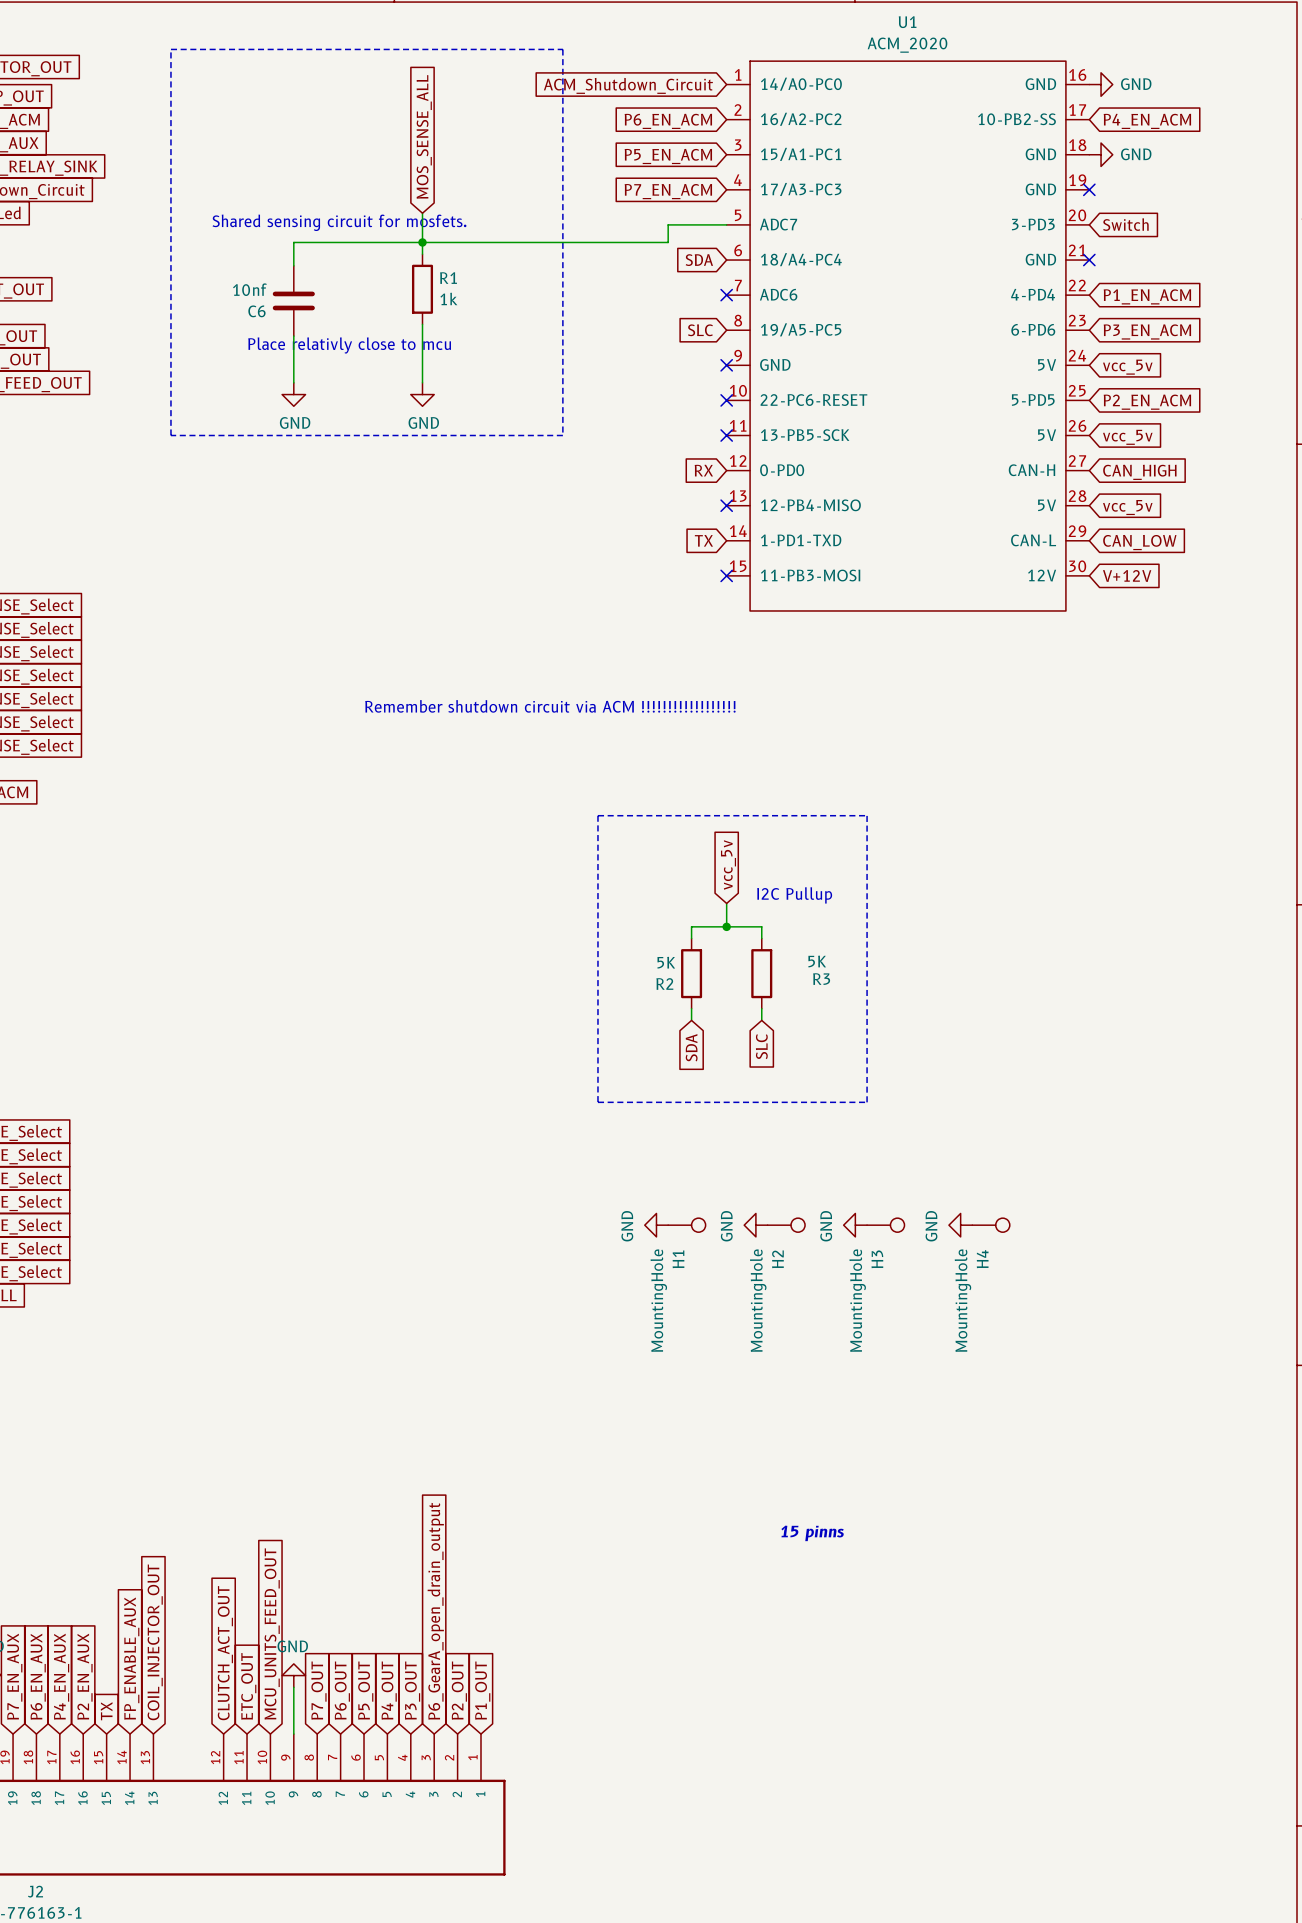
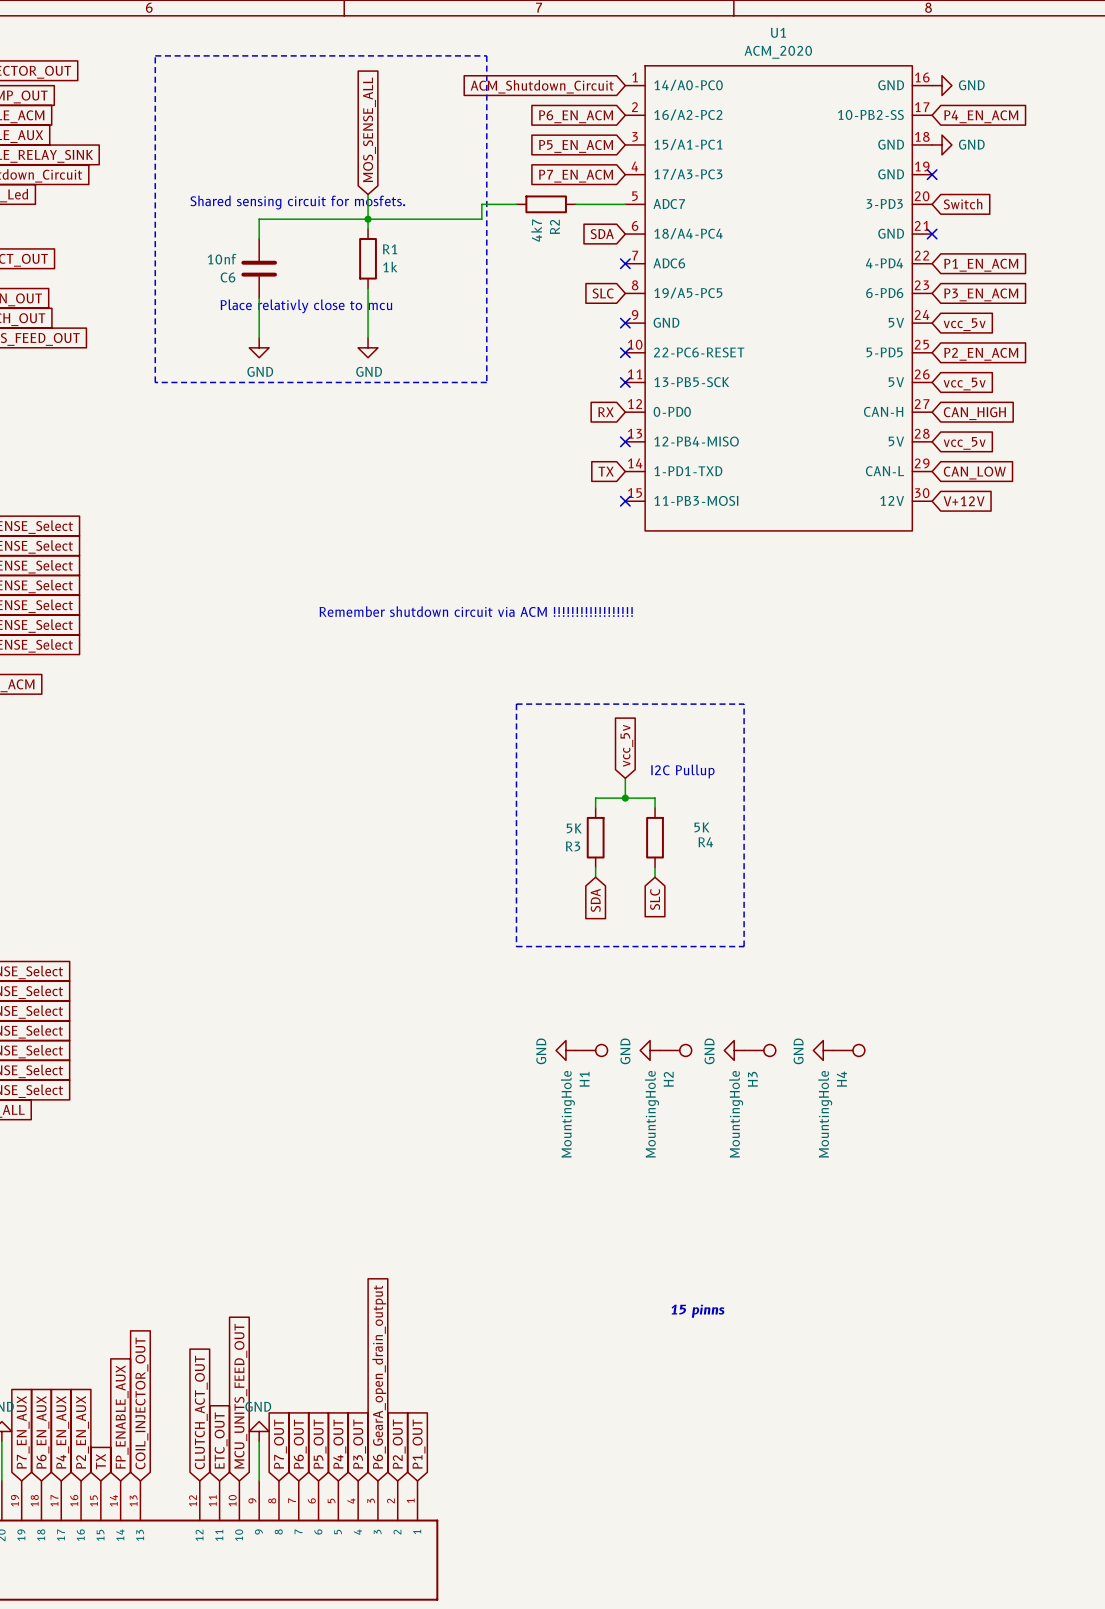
R2: none -> 4k7 (546, 204)
wire: (668, 224) (668, 242) (557, 242) -> (516, 204) (481, 204) (481, 219)
R3 name: R3 (821, 979) -> R4 (705, 842)
R2 name: R2 (664, 983) -> R3 (573, 846)

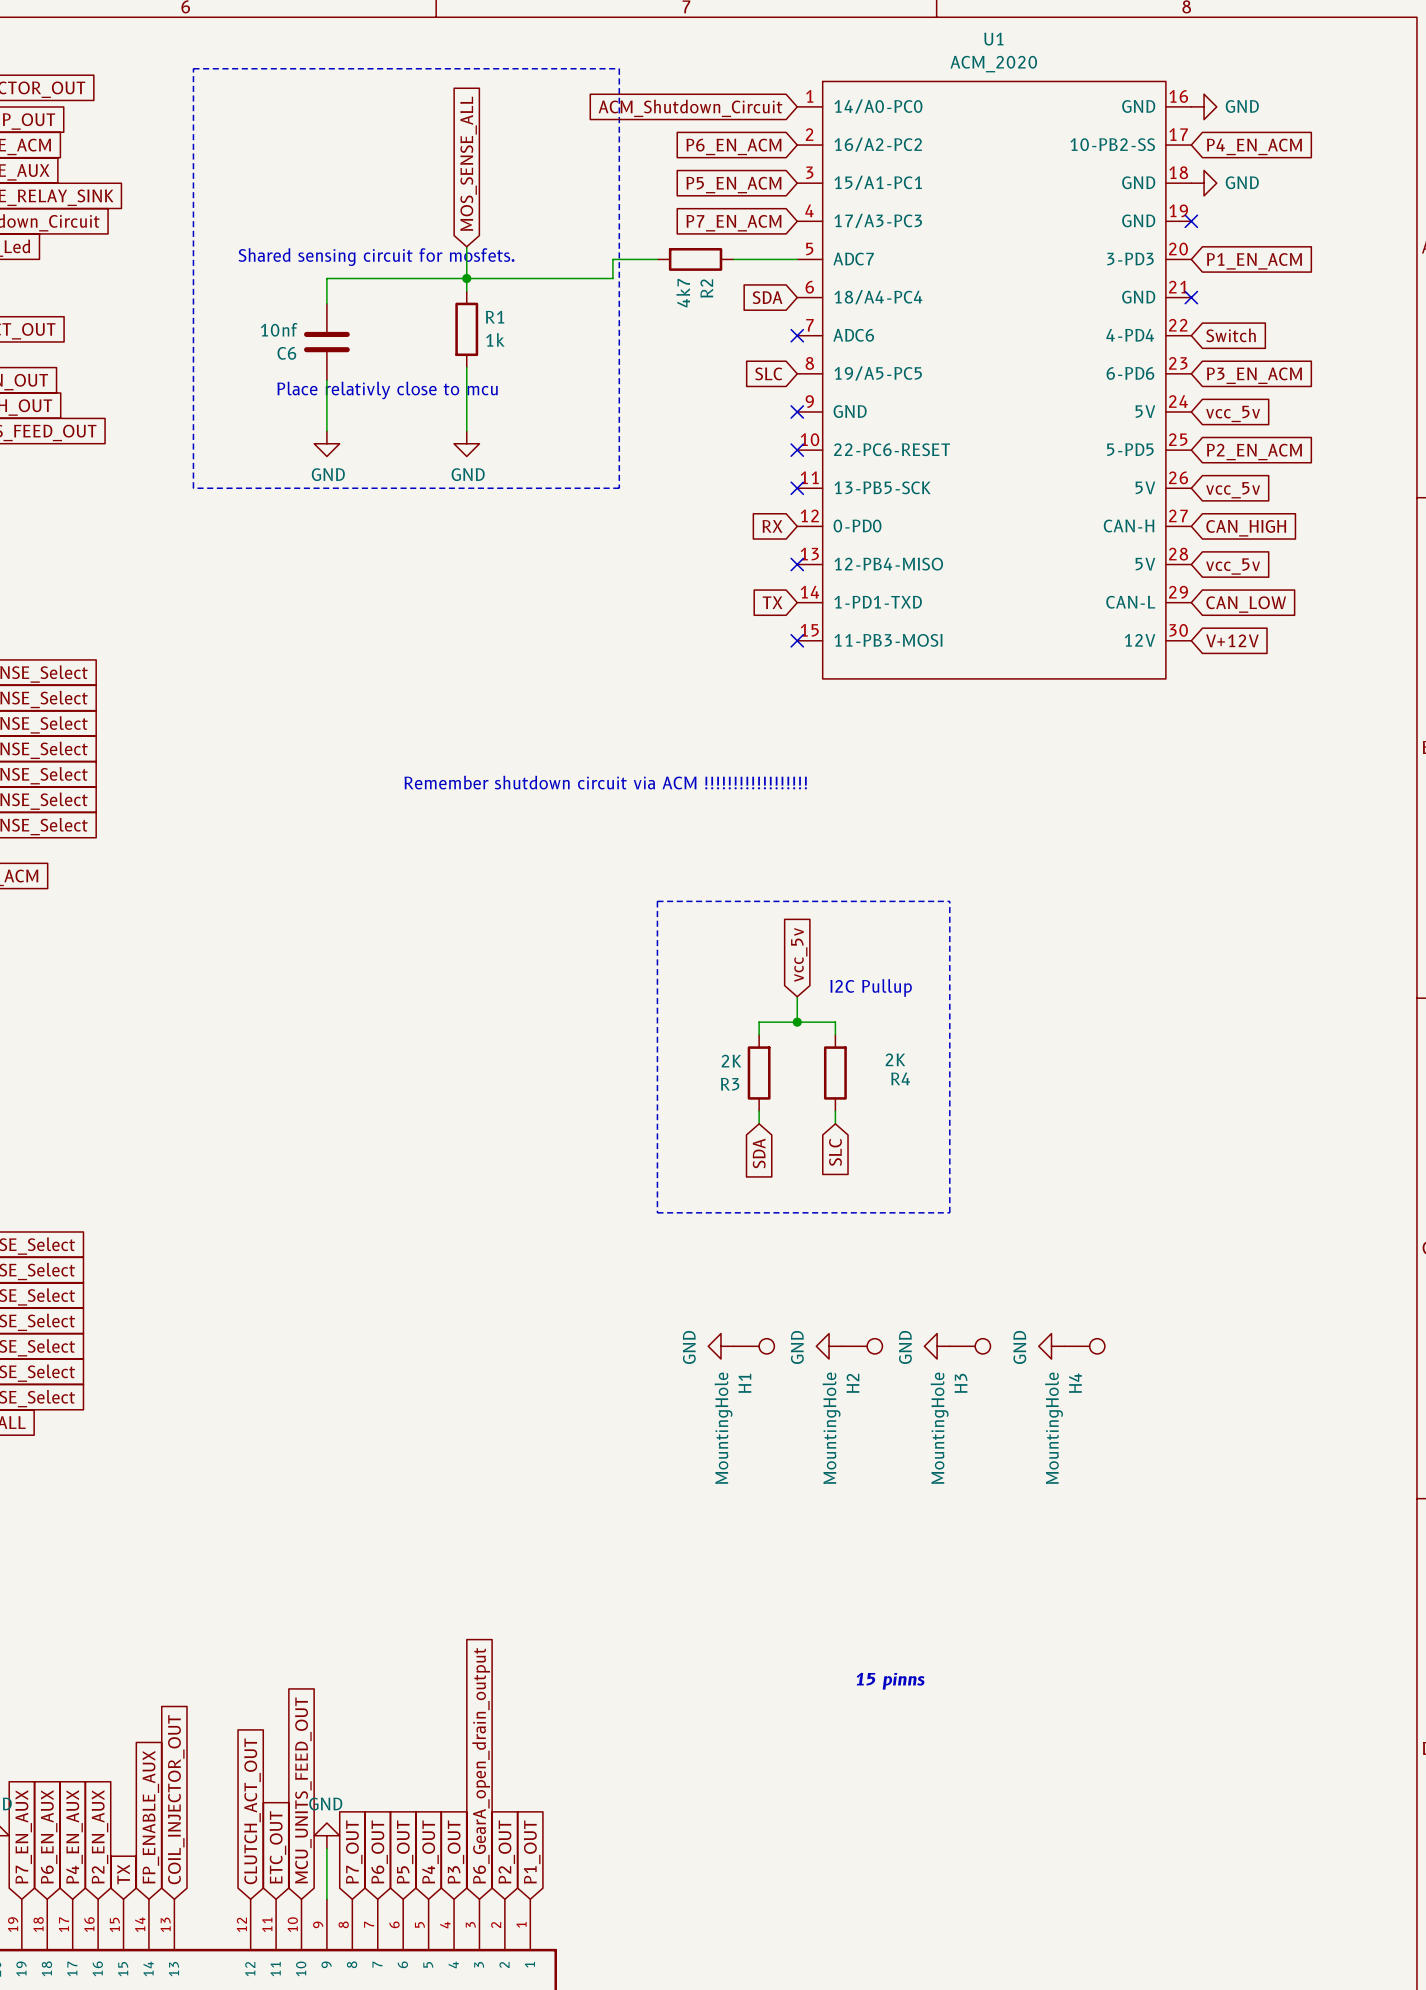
global label: Switch (963, 204) -> P1_EN_ACM (1254, 261)
global label: P1_EN_ACM (981, 265) -> Switch (1231, 335)
R4 value: 5K (701, 827) -> 2K (895, 1059)
R3 value: 5K (574, 828) -> 2K (731, 1061)

